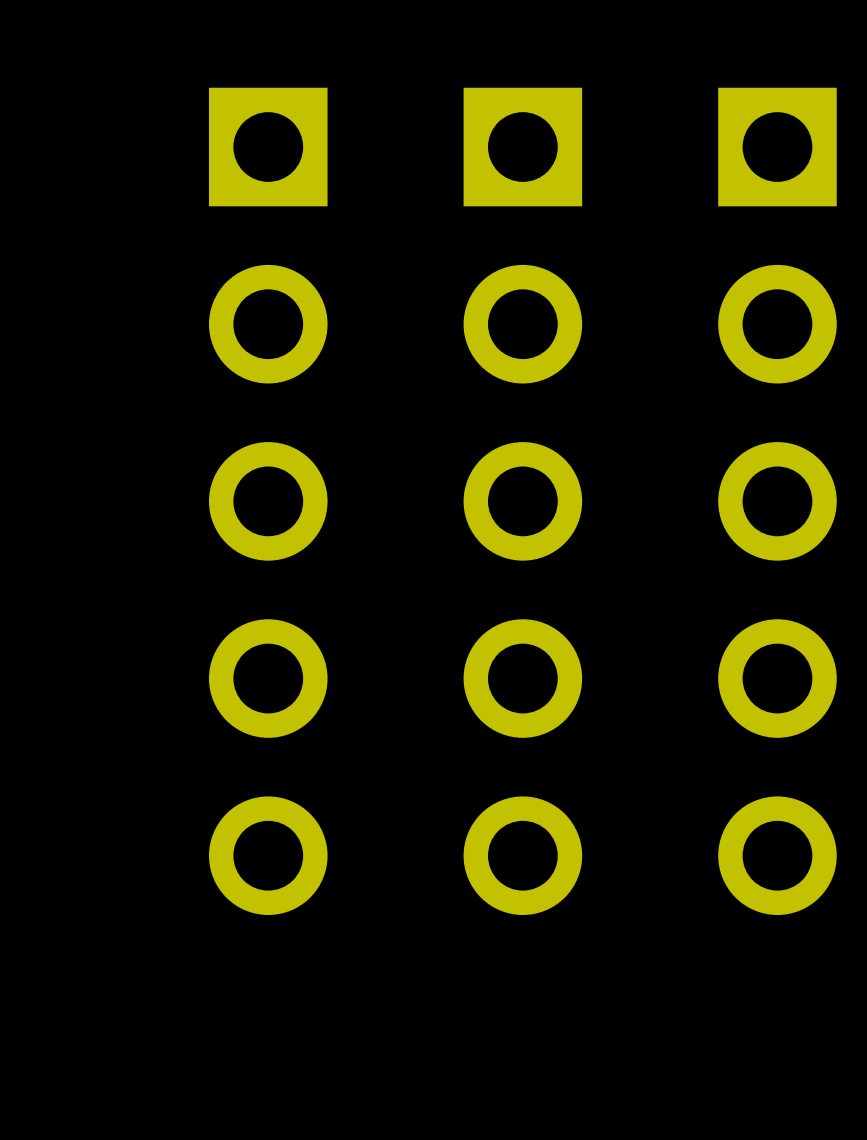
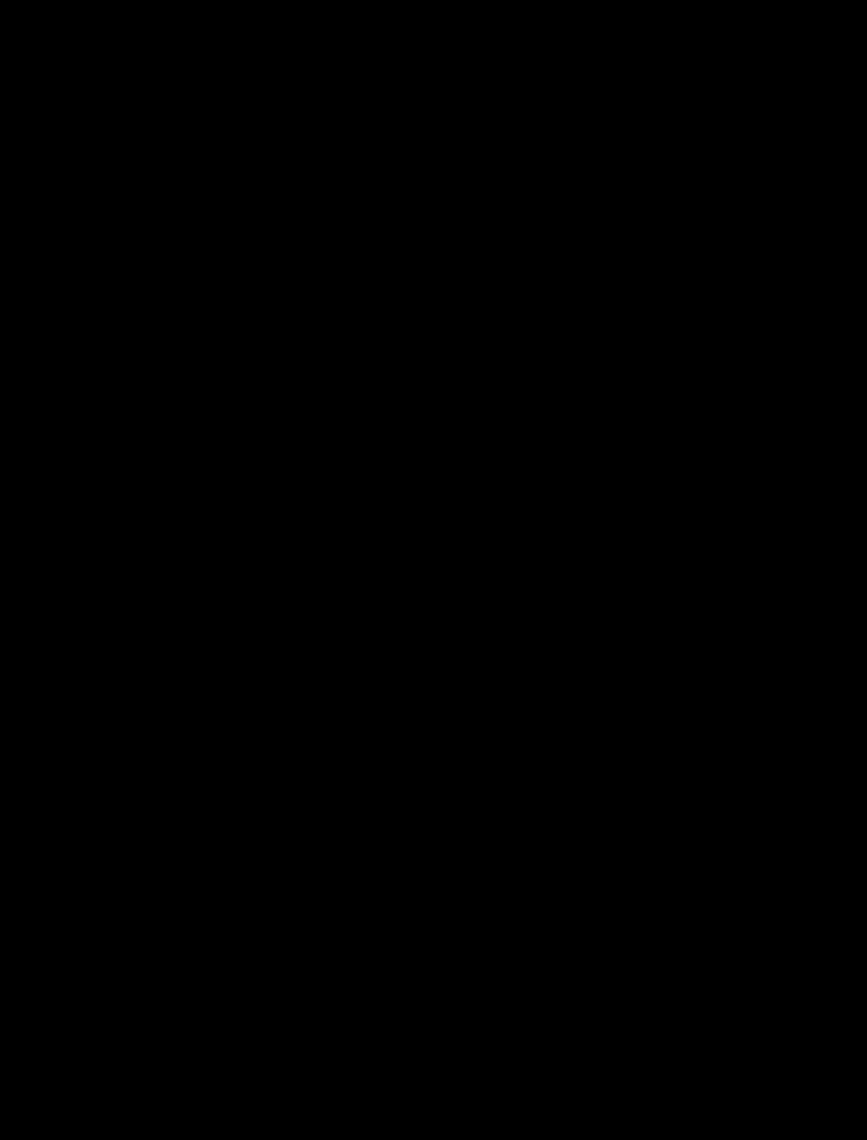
part: (268, 501) -> none
part: (522, 501) -> none
part: (777, 501) -> none

